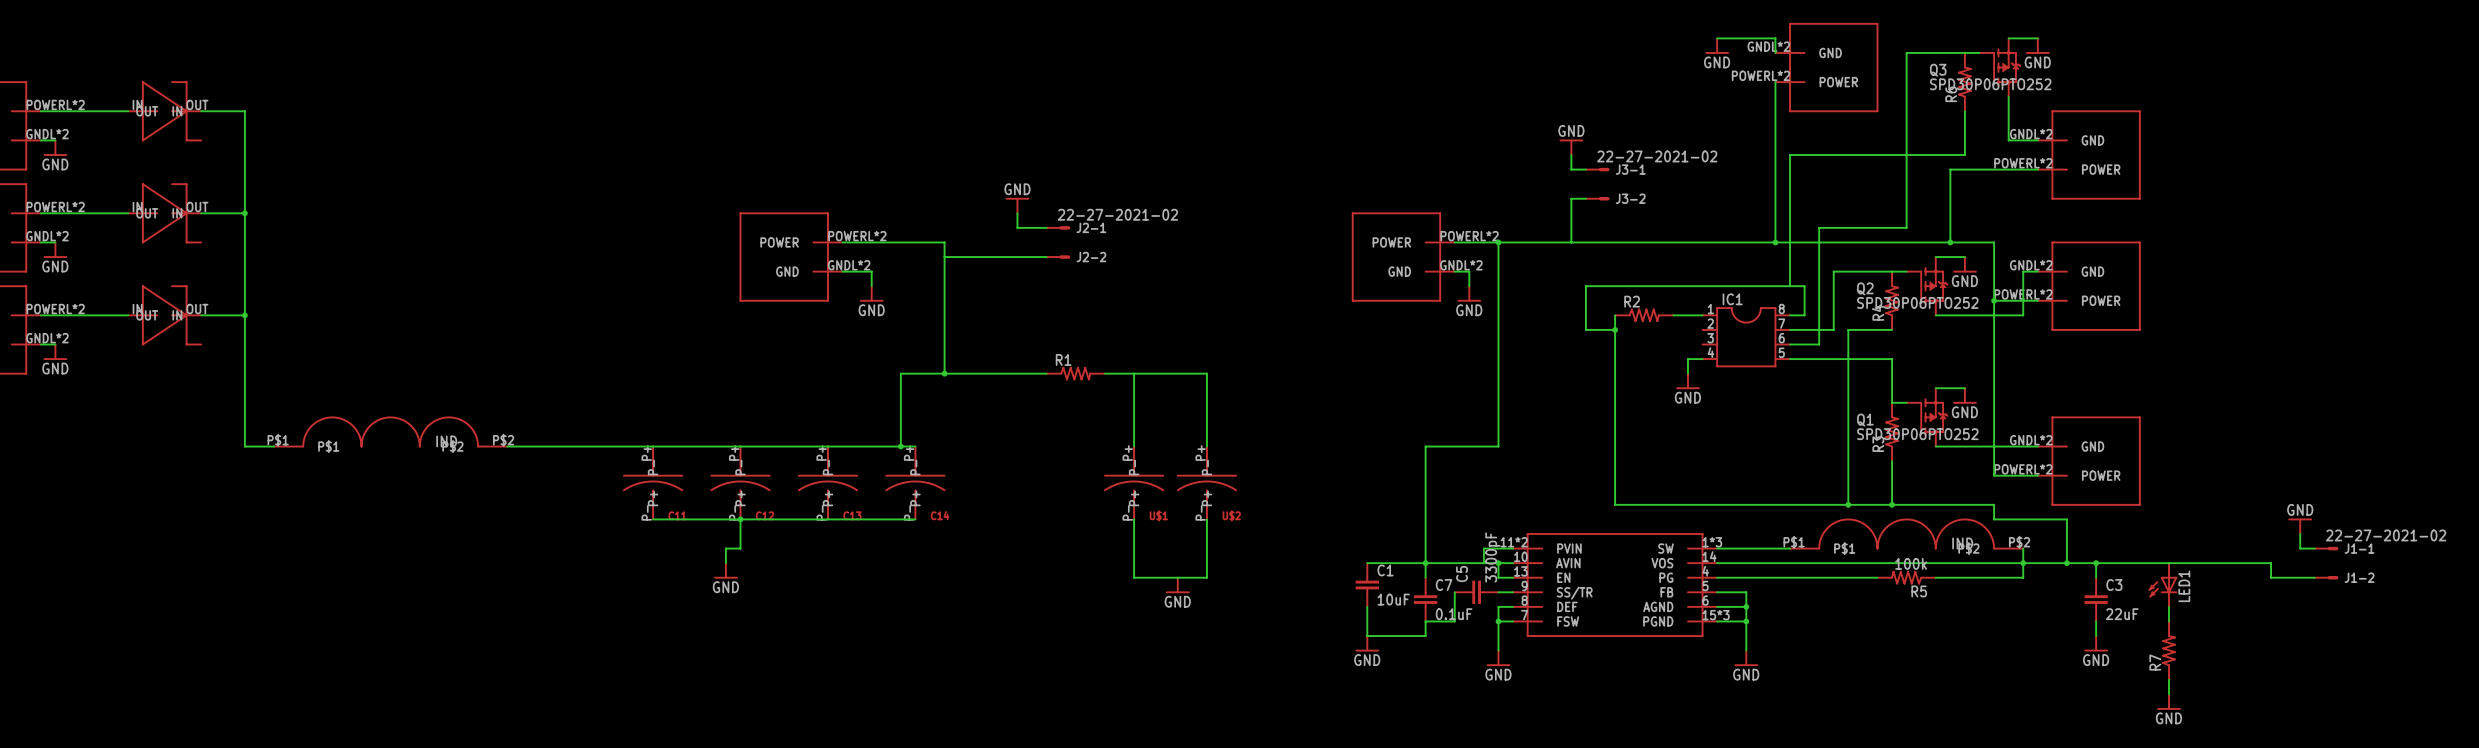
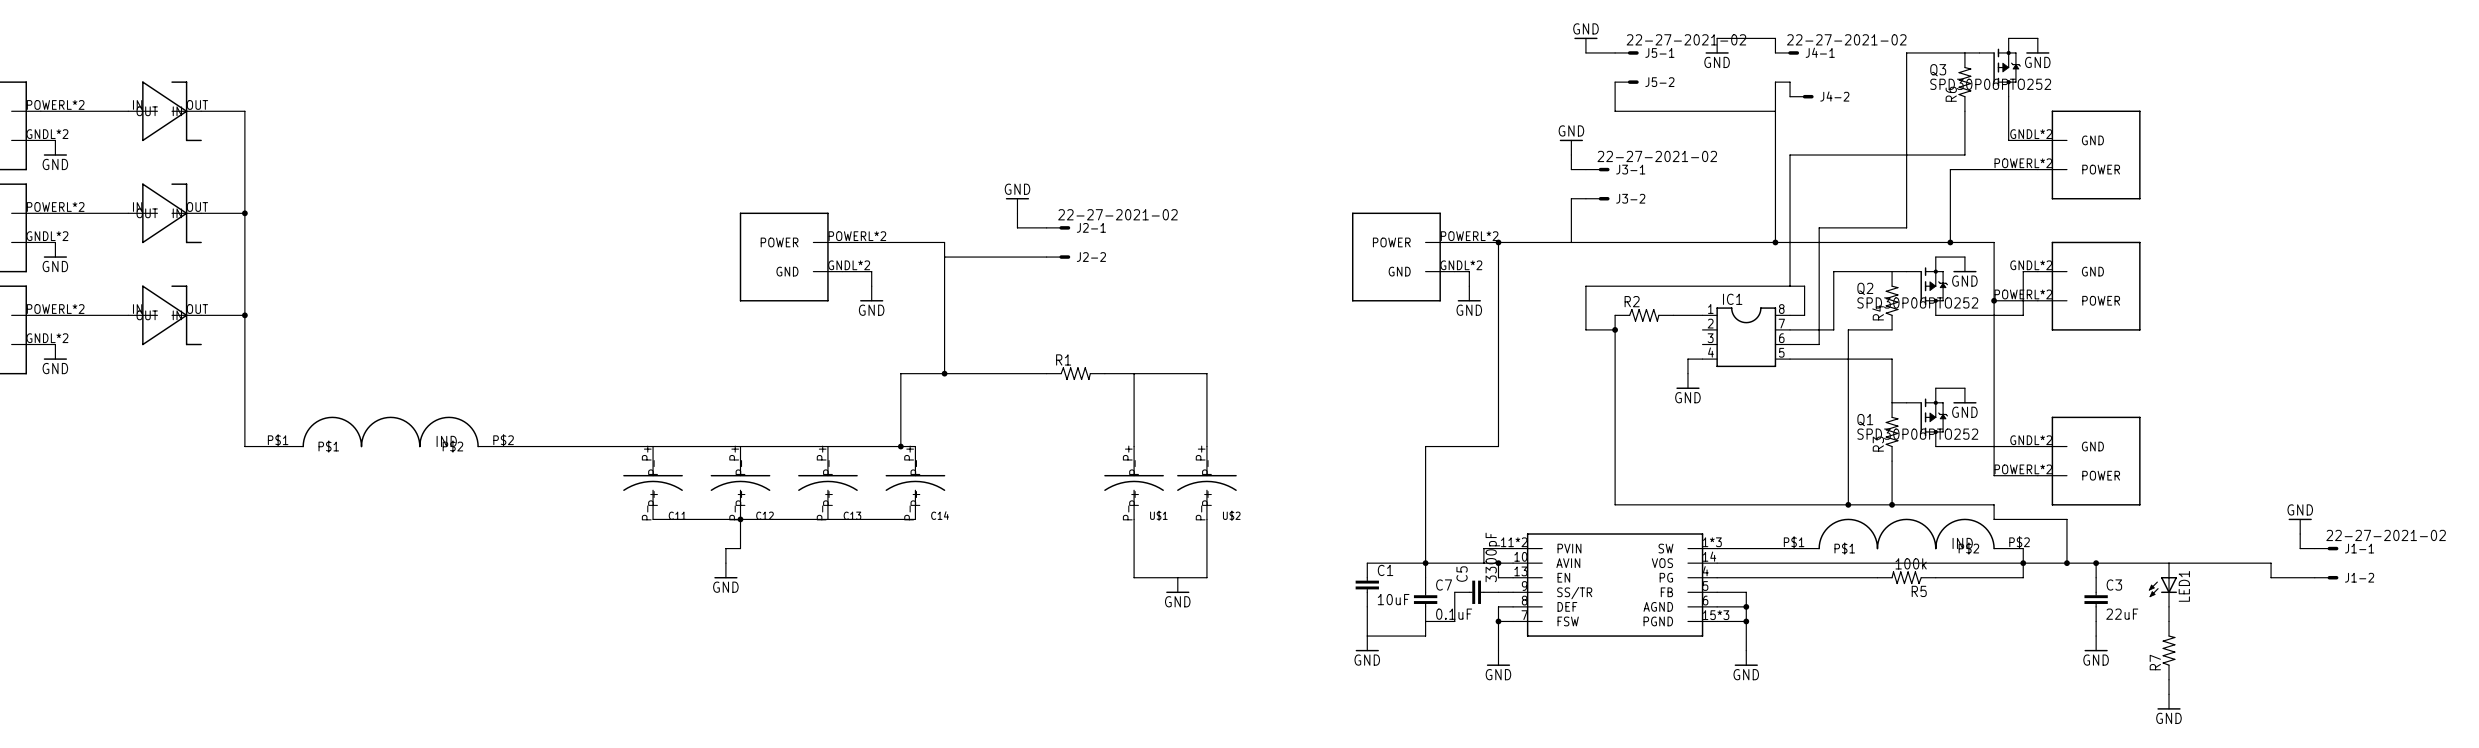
power symbol: none -> GND (1585, 45)
wire: none -> (1585, 52) (1615, 52)
J5-1: none -> 22-27-2021-02 (1626, 52)
J4-1: none -> 22-27-2021-02 (1787, 52)
part: (1826, 67) -> none
wire: none -> (1615, 82) (1615, 111) (1775, 111)
J5-2: none -> (1626, 82)
J4-2: none -> (1801, 96)

